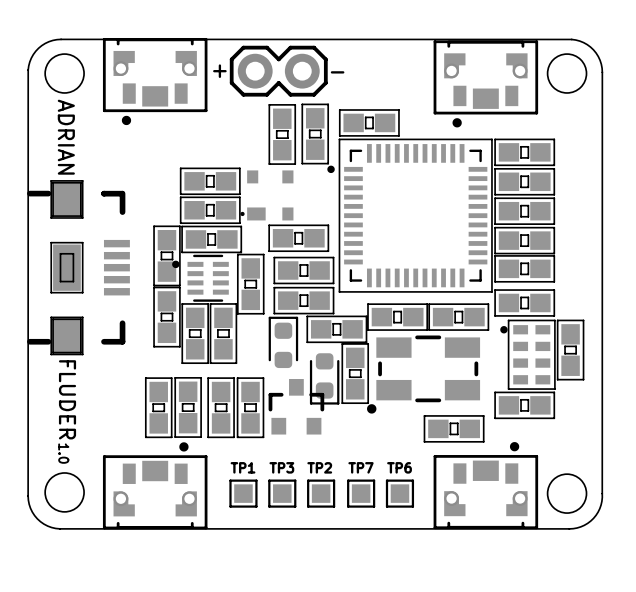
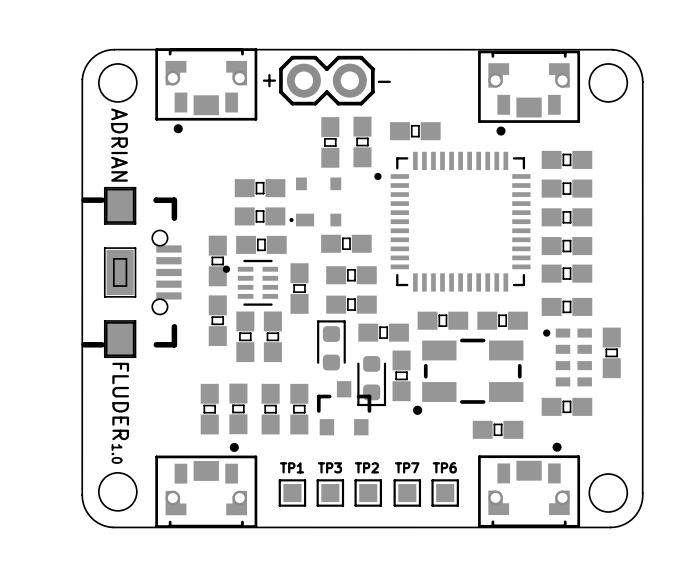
part footprint: [301, 103, 329, 165] -> [353, 116, 372, 168]
part footprint: [268, 104, 296, 165] -> [321, 117, 340, 168]
part footprint: [339, 109, 400, 137] -> [390, 122, 441, 141]
part footprint: [327, 138, 493, 293] -> [374, 151, 531, 292]
part footprint: [494, 138, 555, 166] -> [541, 150, 593, 169]
part footprint: [180, 167, 241, 195] -> [234, 179, 286, 198]
part footprint: [494, 168, 555, 196] -> [541, 179, 593, 198]
part footprint: [27, 180, 130, 356] -> [81, 187, 182, 358]
part footprint: [180, 196, 241, 224] -> [234, 207, 286, 226]
part footprint: [494, 197, 555, 225] -> [541, 208, 593, 227]
part footprint: [268, 224, 329, 252] -> [321, 234, 372, 253]
part footprint: [153, 225, 181, 286] -> [208, 235, 227, 287]
part footprint: [181, 226, 242, 253] -> [236, 235, 287, 254]
part footprint: [494, 227, 555, 255] -> [541, 237, 593, 256]
part footprint: [237, 254, 265, 315] -> [290, 263, 309, 314]
part footprint: [494, 255, 555, 283] -> [541, 264, 593, 283]
part footprint: [273, 257, 335, 284] -> [326, 266, 377, 285]
part footprint: [153, 287, 181, 348] -> [208, 295, 227, 347]
part footprint: [273, 287, 335, 315] -> [326, 295, 377, 314]
part footprint: [494, 289, 555, 317] -> [541, 297, 593, 316]
part footprint: [181, 303, 209, 364] -> [236, 311, 255, 363]
part footprint: [210, 303, 237, 364] -> [263, 311, 282, 363]
part footprint: [367, 303, 428, 331] -> [417, 311, 469, 330]
part footprint: [428, 303, 489, 331] -> [477, 311, 528, 330]
part footprint: [306, 315, 367, 343] -> [358, 323, 409, 342]
part footprint: [557, 319, 585, 381] -> [602, 327, 621, 379]
part footprint: [500, 320, 556, 390] -> [543, 328, 592, 387]
part footprint: [341, 343, 369, 404] -> [392, 350, 411, 402]
part footprint: [145, 377, 173, 438] -> [200, 383, 219, 435]
part footprint: [174, 377, 202, 438] -> [229, 383, 248, 435]
part footprint: [207, 377, 235, 438] -> [261, 383, 280, 435]
part footprint: [237, 377, 264, 438] -> [290, 383, 309, 435]
part footprint: [494, 391, 555, 419] -> [541, 397, 593, 416]
part footprint: [424, 415, 485, 443] -> [472, 420, 524, 439]

